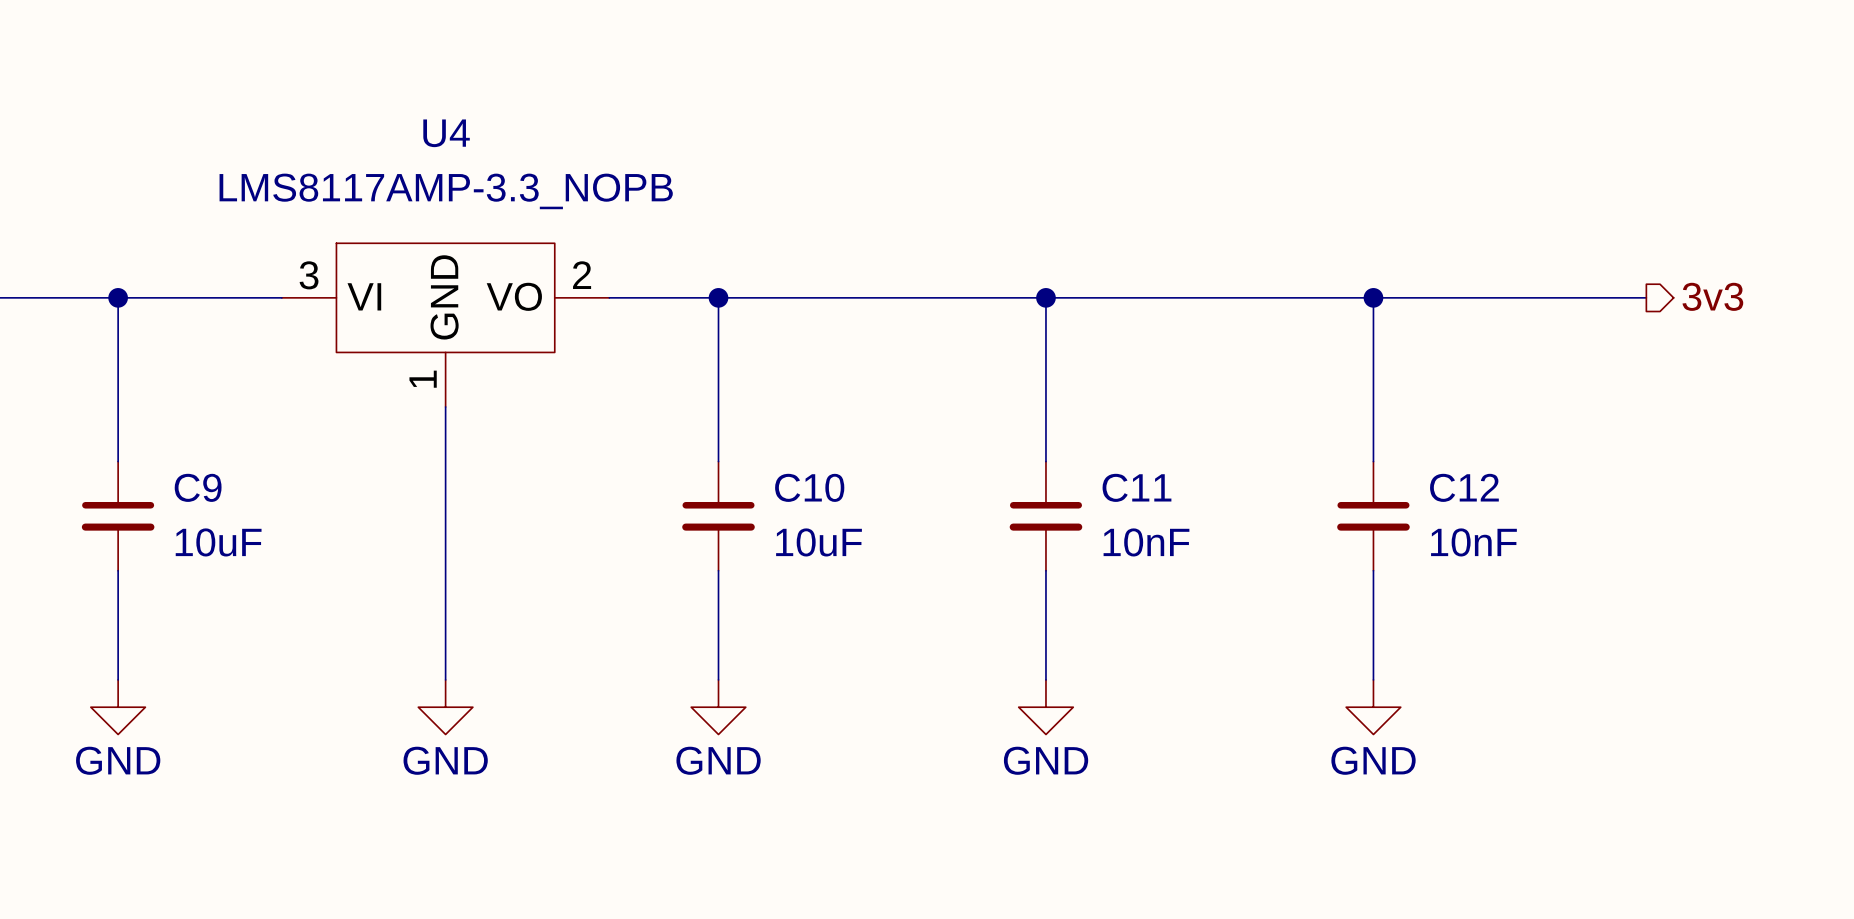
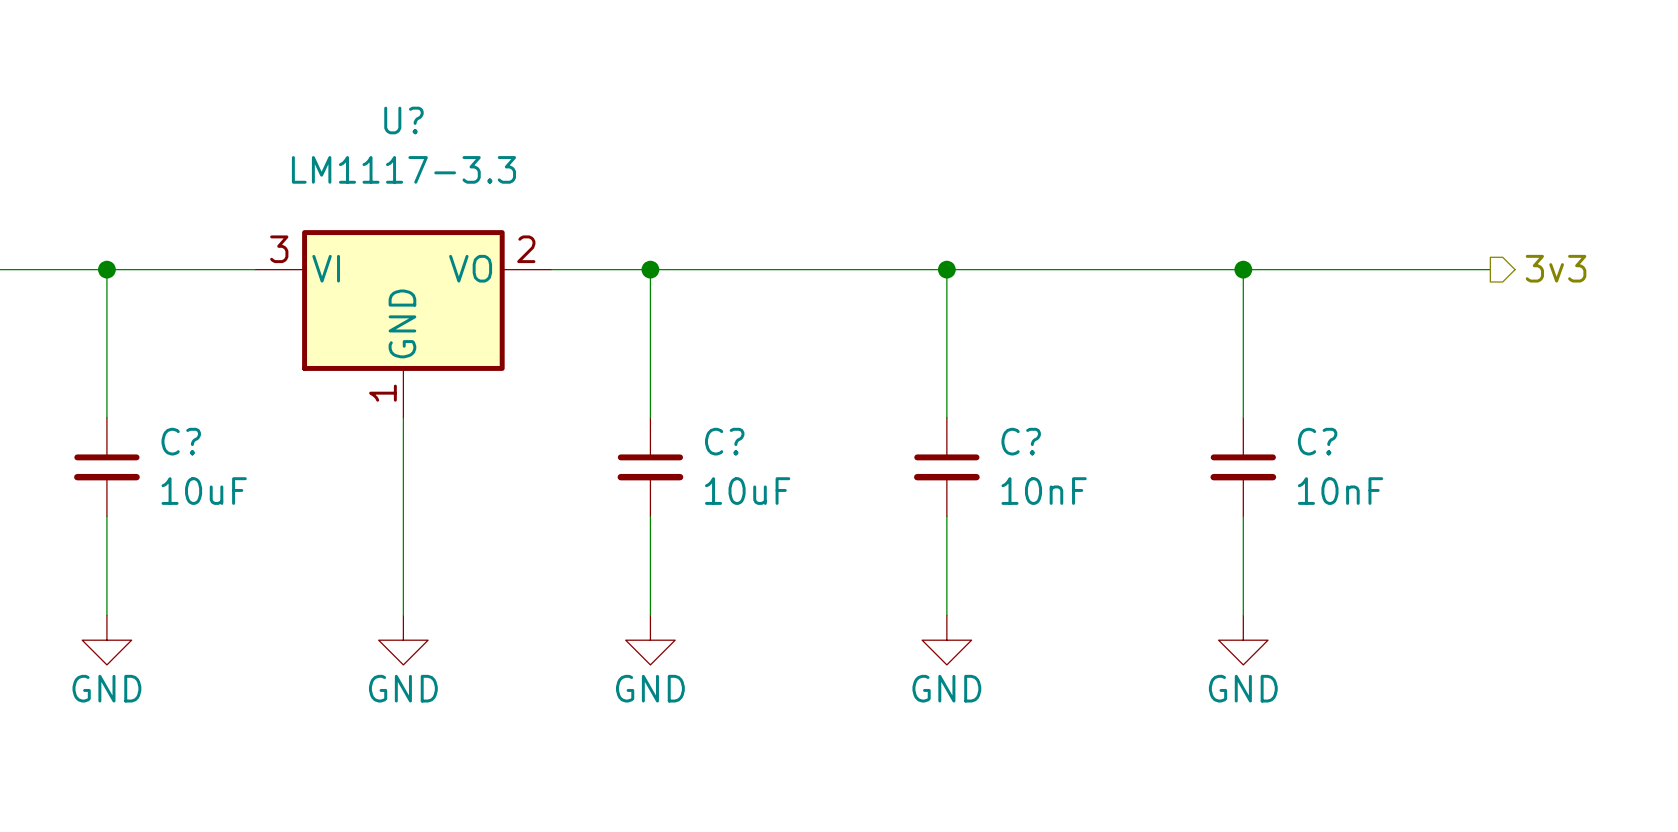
U4: LMS8117AMP-3.3_NOPB (445, 325) -> none
U?: none -> LM1117-3.3 (403, 323)
C9 name: C9 (198, 487) -> C? (181, 441)
C10 name: C10 (809, 487) -> C? (724, 441)
C11 name: C11 (1136, 487) -> C? (1021, 441)
C12 name: C12 (1464, 487) -> C? (1317, 441)

